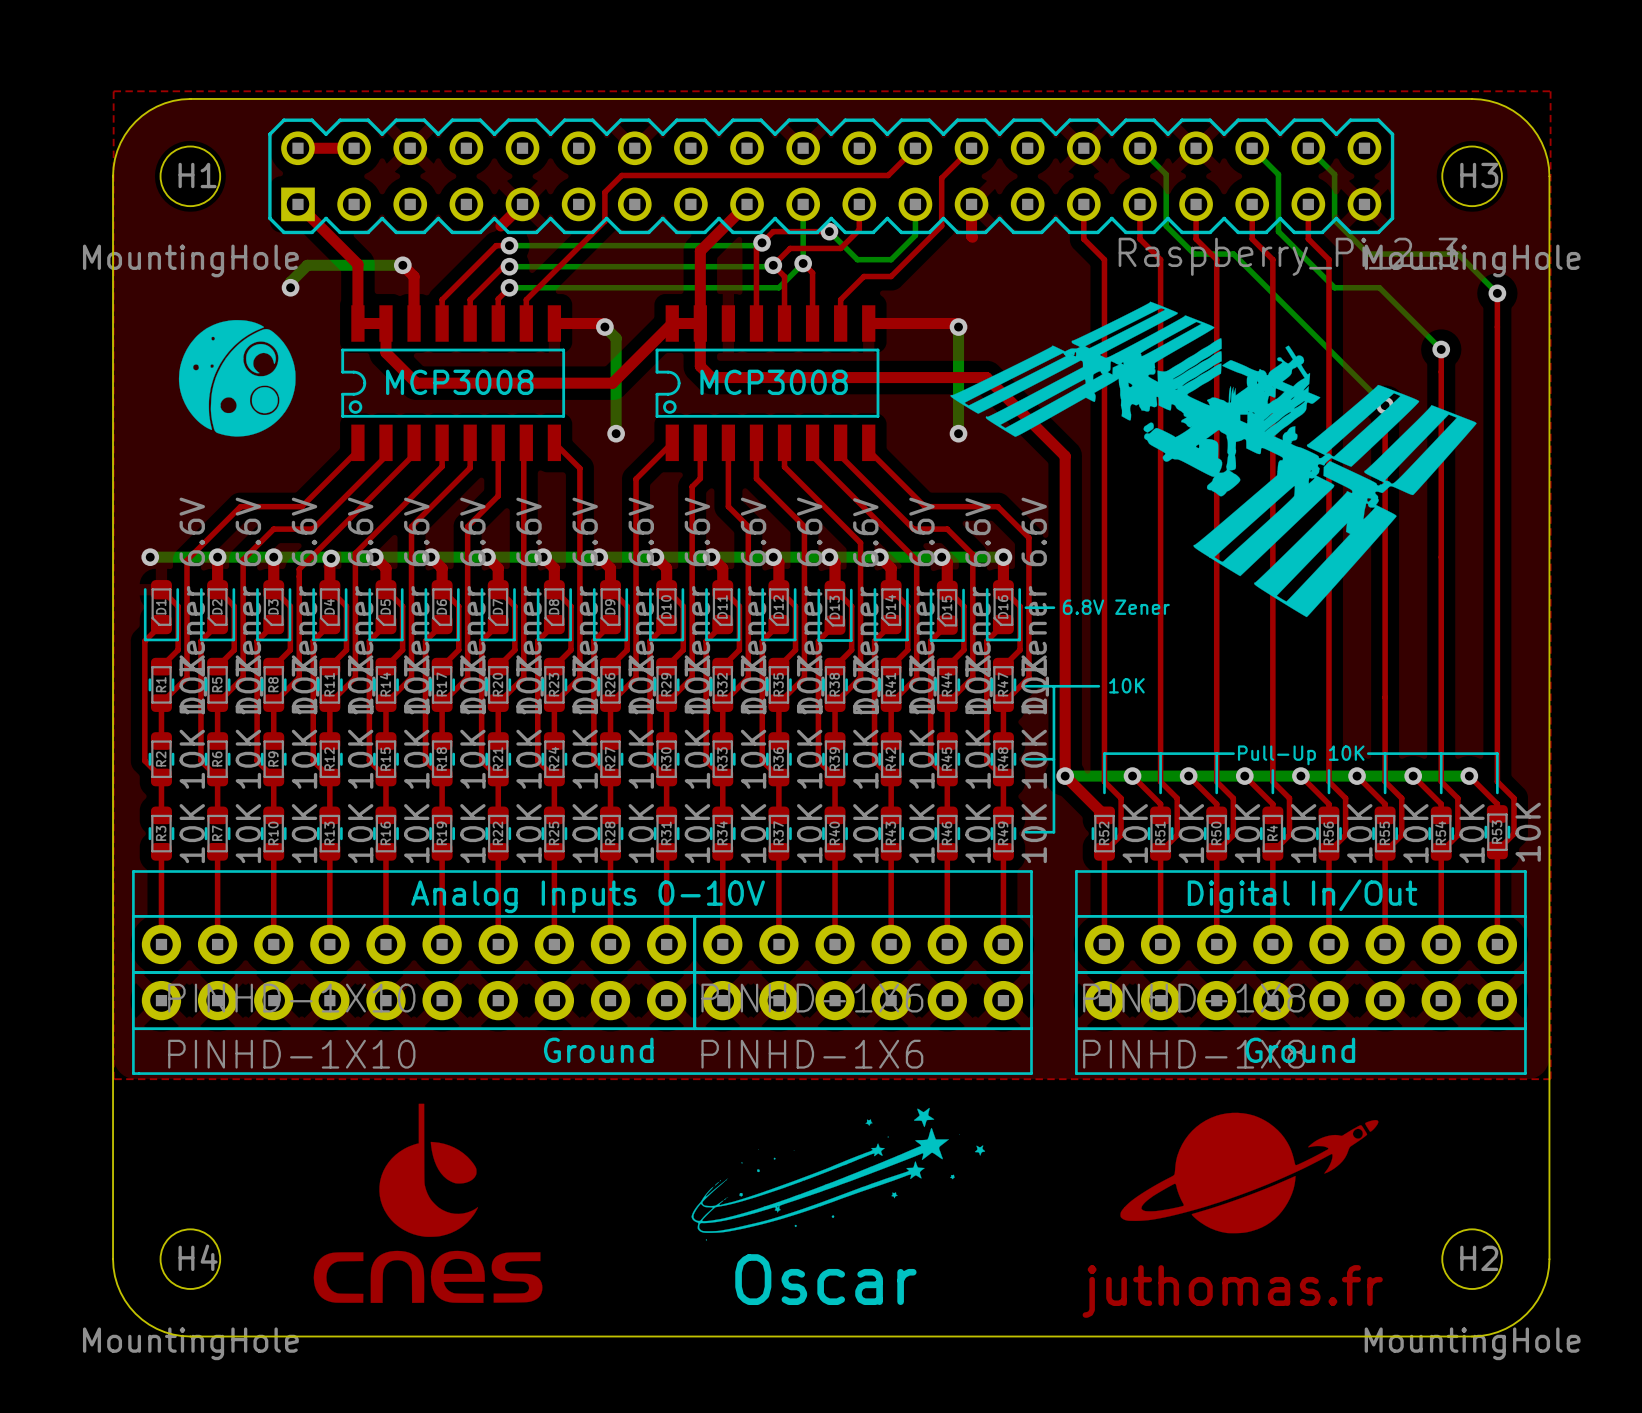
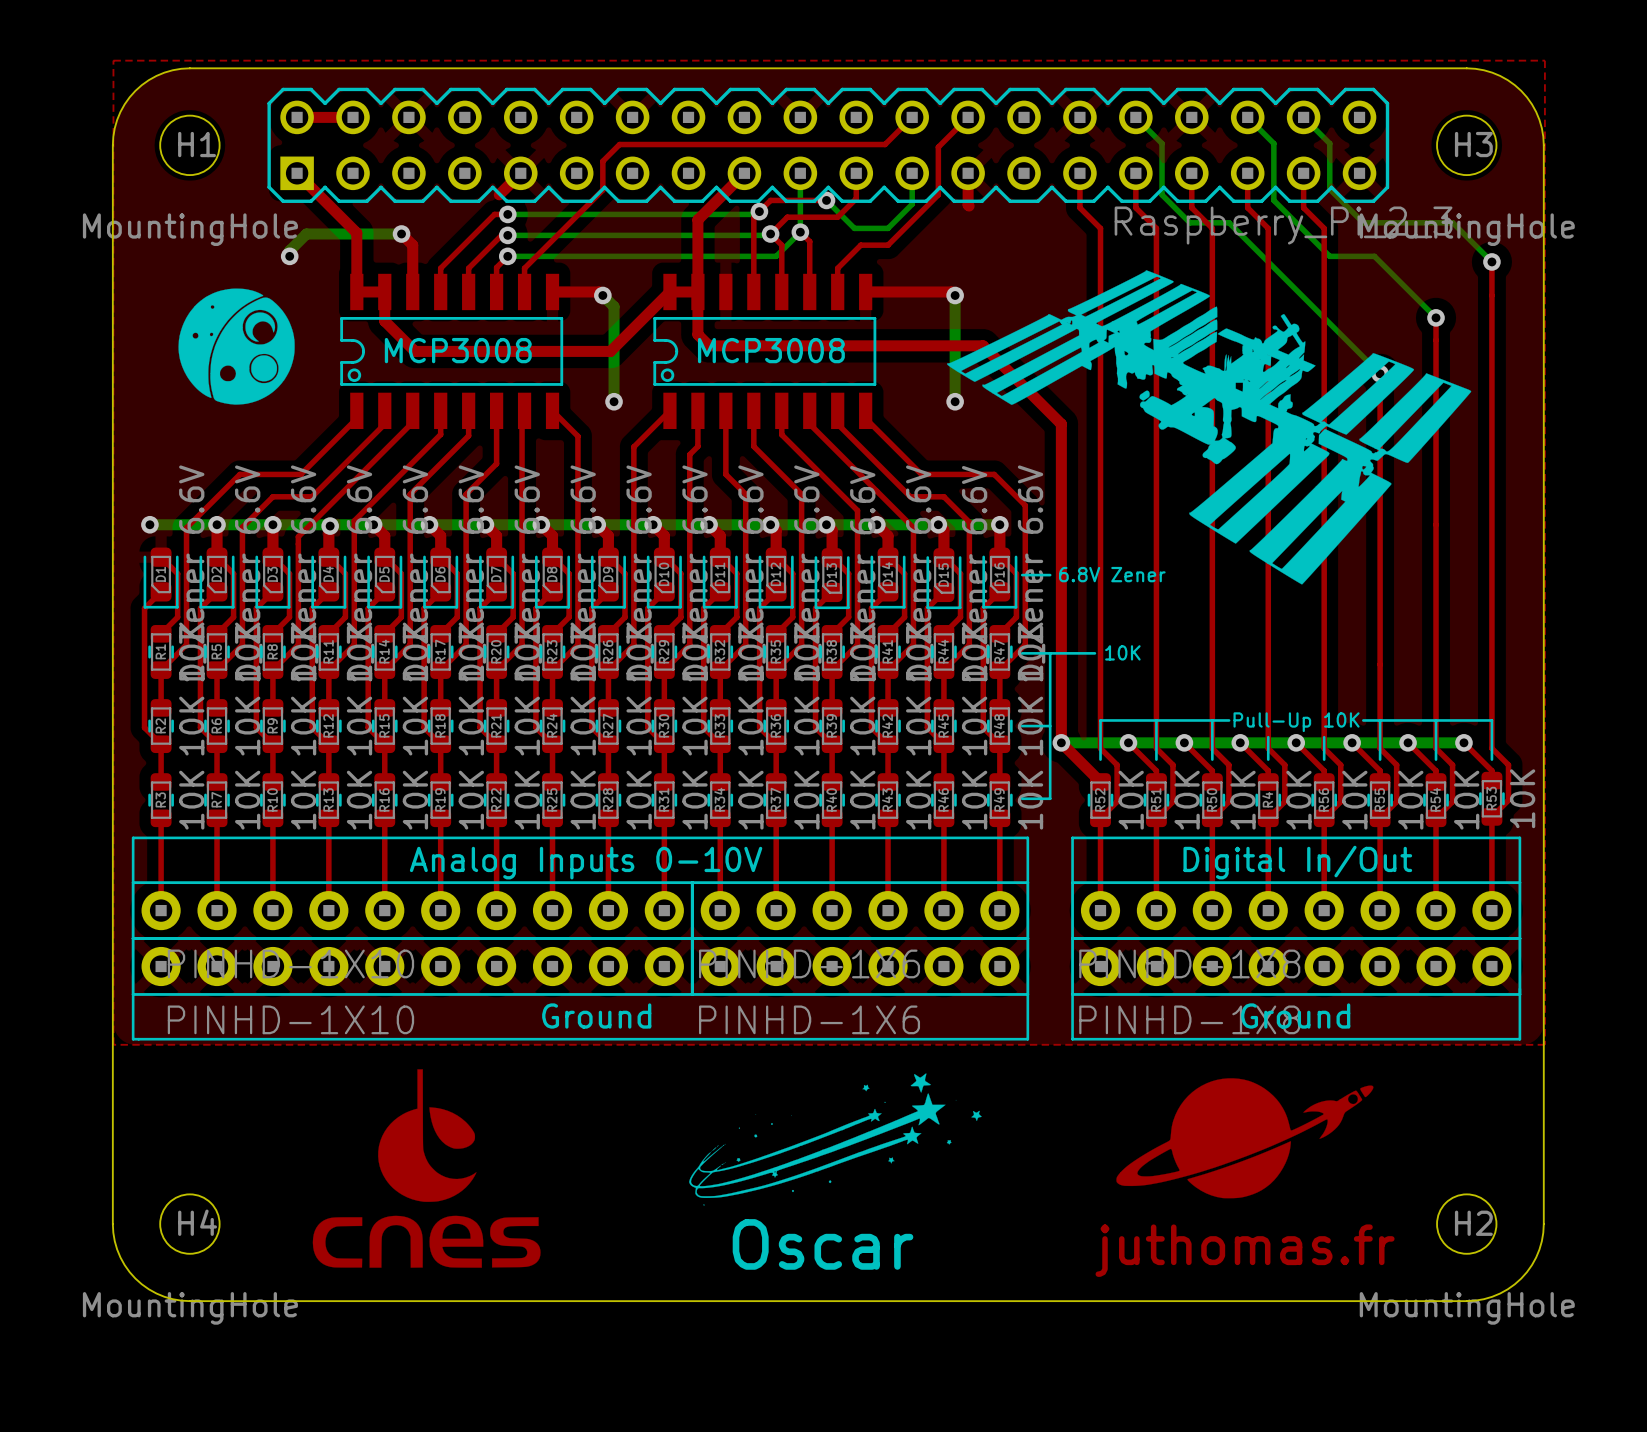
drawing shape: [1120, 1112, 1379, 1234] -> [1095, 1078, 1395, 1277]
text: juthomas.fr (1232, 1291) -> none

